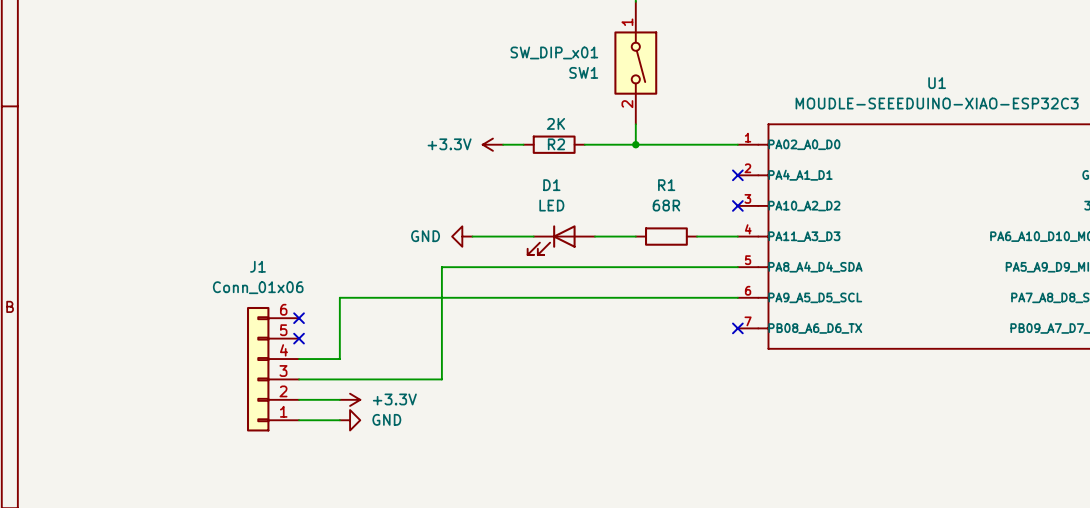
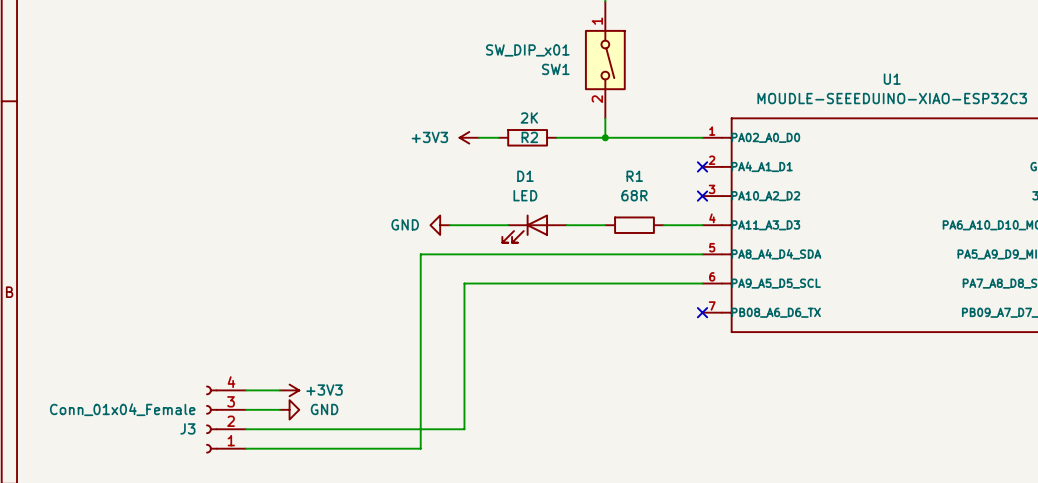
power symbol: +3.3V (492, 144) -> +3V3 (469, 137)
wire: (487, 297) (339, 297) (339, 359) (299, 359) -> (464, 283) (464, 429) (245, 429)
no-connect mark: (299, 318) -> none
no-connect mark: (299, 338) -> none
J1: Conn_01x06 (273, 369) -> none
wire: (299, 379) (441, 379) -> (245, 448) (420, 448) (420, 361)
wire: (299, 399) (339, 399) -> none
power symbol: +3.3V (350, 399) -> none
wire: none -> (245, 390) (279, 390)
power symbol: none -> +3V3 (289, 390)
wire: (299, 420) (339, 420) -> none
power symbol position: GND (350, 420) -> GND (289, 409)
wire: none -> (245, 409) (279, 409)
J3: none -> Conn_01x04_Female (226, 419)

